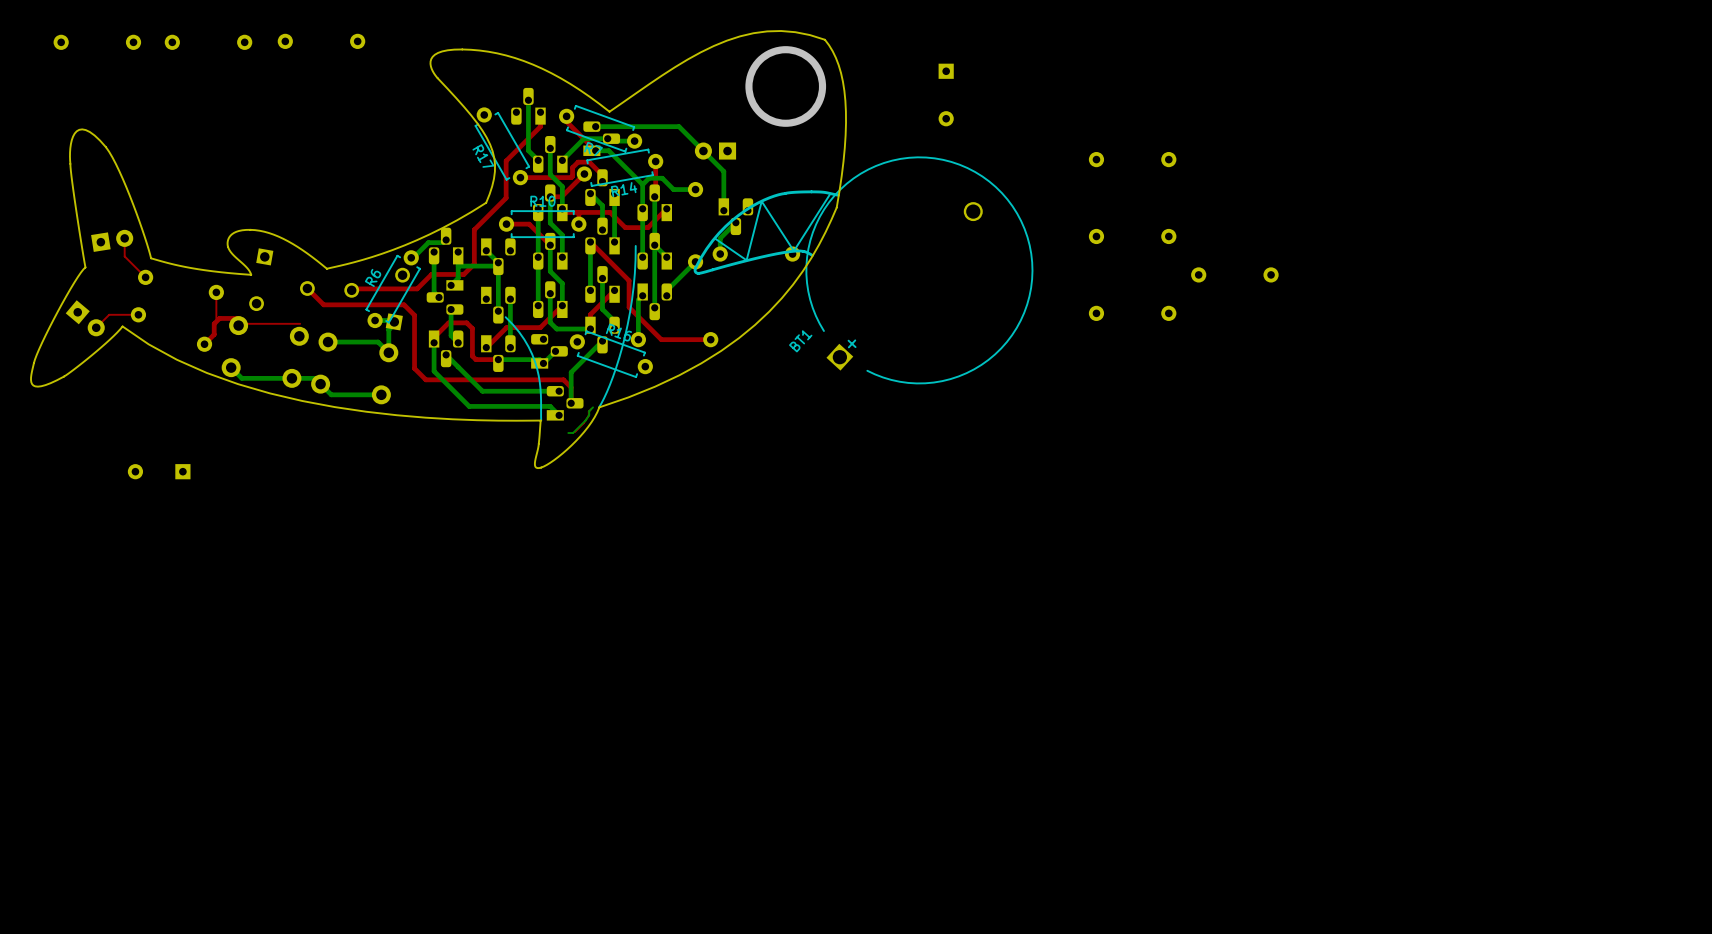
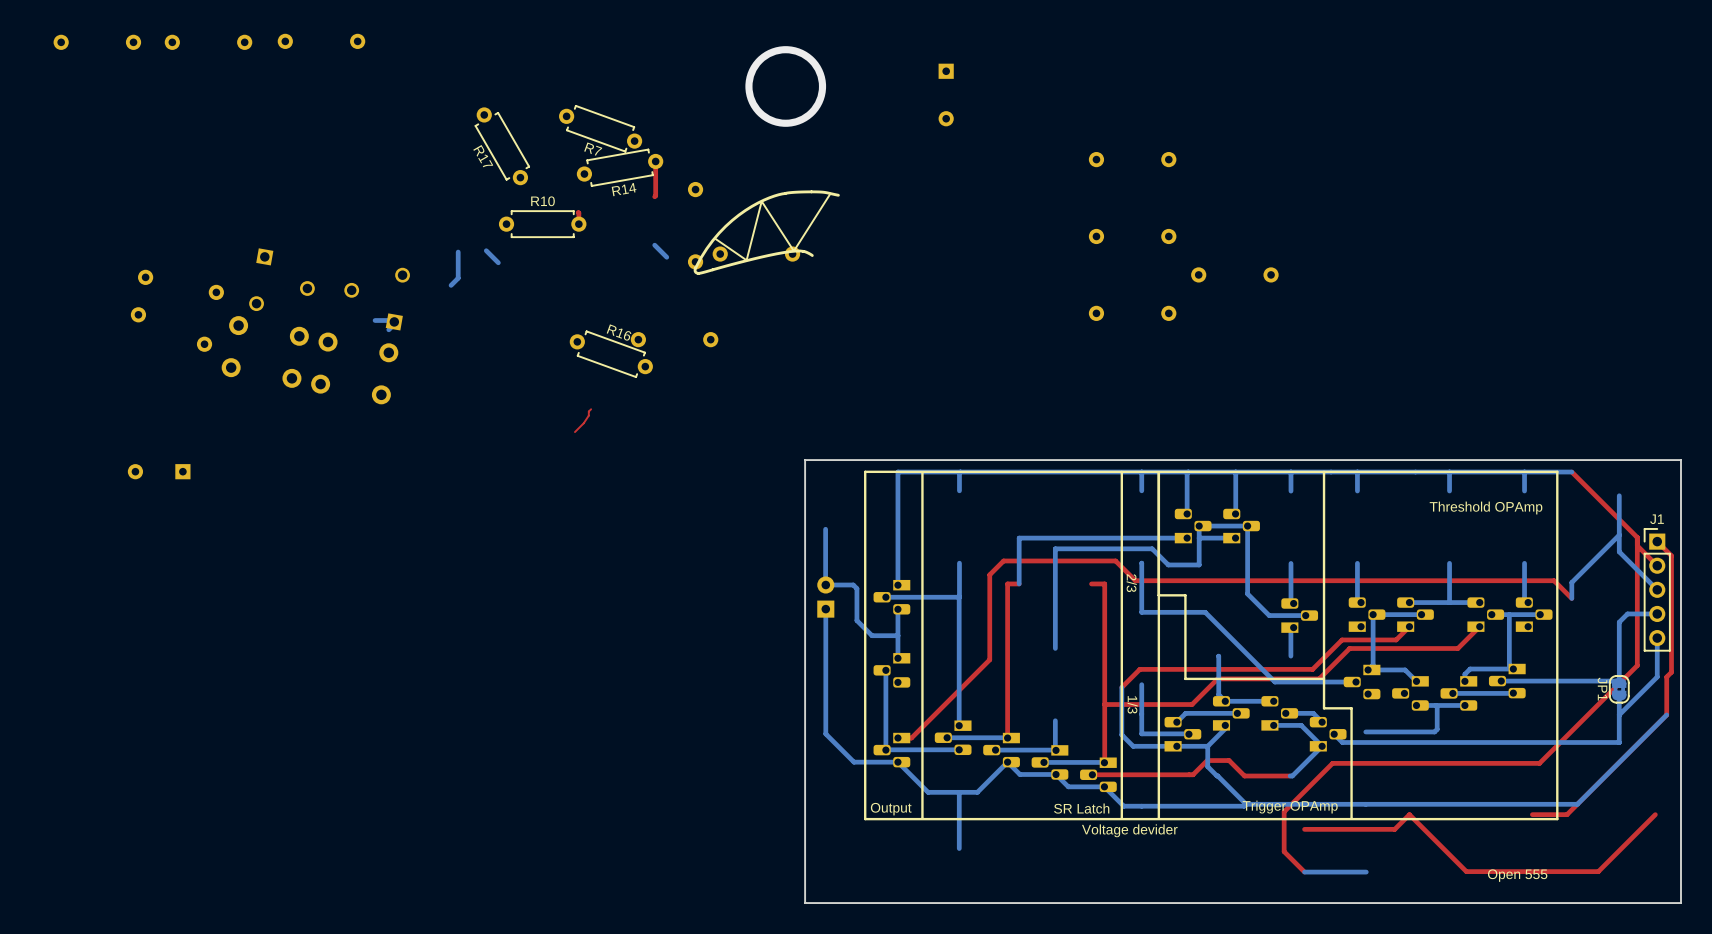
board edge: (824, 39) (835, 57) (842, 81) (845, 111) (844, 147) (836, 207) (819, 244) (802, 271) (769, 311) (739, 338) (679, 375) (628, 397) (599, 407) (591, 421) (575, 441) (558, 456) (543, 466) (537, 468) (534, 464) (540, 420) (425, 417) (366, 411) (302, 401) (238, 384) (206, 372) (148, 344) (122, 326) (101, 347) (65, 375) (41, 386) (32, 384) (31, 377) (33, 363) (42, 342) (66, 296) (85, 267) (70, 160) (71, 140) (79, 129) (85, 130) (94, 135) (112, 157) (133, 204) (151, 258) (197, 269) (251, 274) (246, 267) (230, 252) (227, 242) (230, 235) (236, 231) (255, 230) (269, 233) (288, 241) (326, 268) (362, 259) (404, 245) (443, 227) (486, 202) (494, 171) (492, 151) (477, 123) (432, 71) (431, 59) (438, 52) (454, 49) (479, 50) (523, 61) (570, 83) (609, 111) (674, 67) (726, 40) (753, 33) (781, 31) (809, 35) (824, 39) -> none
bottom track: (528, 100) (528, 150) (538, 160) -> none
part: (528, 106) -> none
top track: (540, 112) (540, 126) (506, 161) (506, 198) (474, 229) (474, 264) (463, 274) (431, 274) (417, 288) (352, 288) -> none
top track: (566, 116) (566, 121) (595, 150) -> none
bottom track: (595, 126) (679, 126) (723, 171) (723, 210) -> none
part: (601, 138) -> none
bottom track: (634, 141) (584, 138) (562, 160) -> none
bottom track: (550, 148) (550, 174) (562, 186) (562, 208) -> none
bottom track: (595, 150) (608, 150) (642, 184) -> none
part: (715, 151) -> none
part: (550, 154) -> none
top track: (584, 174) (561, 196) (550, 196) -> none
top track: (520, 177) (571, 177) (572, 167) (578, 162) (589, 162) (602, 175) (602, 181) -> none
bottom track: (642, 184) (649, 178) (662, 178) (673, 189) (695, 189) -> none
bottom track: (642, 184) (642, 257) -> none
part: (602, 187) -> none
bottom track: (590, 193) (602, 205) (602, 230) -> none
bottom track: (614, 193) (614, 242) -> none
bottom track: (550, 196) (550, 223) (562, 235) (562, 257) -> none
bottom track: (654, 196) (654, 307) -> none
part: (550, 202) -> none
part: (654, 202) -> none
bottom track: (538, 208) (538, 305) -> none
top track: (666, 208) (647, 227) (625, 227) (610, 212) (565, 212) (562, 208) -> none
part: (735, 216) -> none
bottom track: (735, 222) (720, 238) (720, 254) -> none
top track: (506, 224) (529, 224) (550, 245) -> none
part: (602, 236) -> none
top track: (124, 238) (124, 256) (145, 277) -> none
bottom track: (446, 239) (443, 242) (428, 242) (411, 257) -> none
part: (112, 240) -> none
top track: (590, 242) (629, 280) (629, 307) (661, 339) (710, 339) -> none
bottom track: (590, 242) (590, 290) -> none
bottom track: (550, 245) (550, 271) (562, 283) (562, 305) -> none
line: (635, 245) (633, 286) (625, 336) (613, 376) (599, 407) -> none
part: (446, 246) -> none
part: (550, 251) -> none
part: (654, 251) -> none
bottom track: (434, 252) (434, 292) (439, 297) -> none
part: (498, 256) -> none
bottom track: (695, 261) (666, 290) (666, 295) -> none
bottom track: (458, 266) (495, 266) (498, 262) (498, 311) -> none
BT1: (919, 270) -> none
bottom track: (602, 278) (602, 309) (614, 321) (614, 329) -> none
part: (602, 284) -> none
top track: (307, 288) (323, 304) (404, 304) (414, 315) (414, 368) (425, 379) (563, 379) (571, 387) (571, 403) -> none
R6: (393, 289) -> none
top track: (614, 290) (590, 314) (590, 329) -> none
top track: (216, 292) (216, 323) -> none
bottom track: (550, 293) (550, 322) (556, 329) (590, 329) -> none
bottom track: (642, 295) (638, 300) (638, 339) -> none
part: (445, 297) -> none
bottom track: (510, 299) (510, 347) -> none
part: (550, 299) -> none
part: (654, 301) -> none
part: (498, 305) -> none
top track: (562, 305) (540, 327) (506, 327) (486, 347) -> none
bottom track: (451, 309) (451, 335) (458, 342) -> none
top track: (138, 314) (109, 314) (96, 327) -> none
line: (505, 317) (524, 339) (534, 361) (540, 388) (541, 420) -> none
part: (85, 318) -> none
top track: (238, 318) (219, 318) (214, 323) (214, 334) (204, 344) -> none
bottom track: (395, 320) (388, 326) (388, 352) (378, 342) (328, 342) -> none
top track: (300, 323) (244, 323) -> none
part: (602, 335) -> none
bottom track: (602, 341) (571, 372) (571, 403) -> none
top track: (434, 342) (434, 337) (448, 322) (466, 322) (472, 328) (472, 356) (475, 359) (498, 359) -> none
bottom track: (434, 342) (434, 371) (469, 406) (550, 406) (559, 415) -> none
part: (446, 348) -> none
part: (549, 351) -> none
bottom track: (555, 351) (543, 363) (539, 359) (498, 359) -> none
part: (498, 353) -> none
bottom track: (446, 354) (482, 391) (559, 391) -> none
bottom track: (231, 367) (241, 378) (314, 378) (331, 394) (381, 394) -> none
part: (565, 403) -> none
bottom track: (593, 407) (585, 420) (573, 433) (568, 433) -> none
board edge: none -> (1680, 460) (805, 460) (805, 903) (1680, 903) (1680, 460)
line: none -> (1121, 471) (1121, 818)
line: none -> (1324, 471) (1324, 708) (1351, 708) (1351, 818)
line: none -> (1557, 471) (865, 471) (865, 819) (1557, 819) (1557, 471)
line: none -> (922, 472) (922, 818)
bottom track: none -> (960, 472) (959, 490)
bottom track: none -> (1141, 472) (1141, 490)
line: none -> (1158, 472) (1158, 818)
bottom track: none -> (1188, 472) (1187, 513)
bottom track: none -> (1235, 472) (1235, 513)
bottom track: none -> (1290, 472) (1290, 491)
bottom track: none -> (1357, 472) (1357, 491)
bottom track: none -> (1449, 472) (1449, 491)
bottom track: none -> (1524, 472) (1524, 491)
top track: none -> (1571, 472) (1637, 537) (1637, 665) (1539, 763) (1332, 763) (1284, 811) (1284, 851) (1304, 872)
bottom track: none -> (1571, 472) (897, 472) (897, 585)
bottom track: none -> (1619, 495) (1619, 551) (1657, 589)
text: none -> Threshold OPAmp (1486, 508)
part: none -> (1193, 526)
part: none -> (1241, 526)
bottom track: none -> (825, 529) (825, 584) (853, 585) (856, 588) (856, 620) (872, 635) (897, 635)
bottom track: none -> (1619, 535) (1571, 582) (1571, 598)
bottom track: none -> (1187, 538) (1019, 538) (1019, 583)
bottom track: none -> (1235, 538) (1199, 538)
top track: none -> (1657, 541) (1671, 555) (1671, 672) (1666, 677) (1666, 714) (1567, 814) (1532, 814)
top track: none -> (1637, 545) (1657, 565)
bottom track: none -> (959, 563) (959, 597)
bottom track: none -> (1141, 563) (1141, 612) (1205, 612) (1274, 682) (1356, 682)
bottom track: none -> (1290, 563) (1290, 600) (1293, 603)
bottom track: none -> (1357, 563) (1357, 598) (1361, 602)
bottom track: none -> (1449, 563) (1449, 602)
bottom track: none -> (1524, 563) (1524, 598) (1528, 602)
top track: none -> (1135, 580) (1554, 580) (1571, 598)
top track: none -> (1135, 580) (1115, 560) (1003, 560) (989, 574) (989, 659) (911, 738) (897, 738)
top track: none -> (1019, 583) (1007, 583) (1007, 738)
top track: none -> (1091, 583) (1104, 583) (1104, 762)
text: none -> 2/3 (1131, 583)
J1: none -> (1657, 589)
line: none -> (1158, 595) (1185, 595) (1185, 678) (1324, 678)
part: none -> (825, 597)
part: none -> (891, 597)
bottom track: none -> (959, 597) (959, 725)
bottom track: none -> (959, 597) (885, 597)
bottom track: none -> (1479, 602) (1409, 602)
bottom track: none -> (825, 609) (825, 733) (853, 762) (897, 762) (928, 792) (977, 792) (1007, 762) (1019, 774) (1056, 774) (1068, 786) (1104, 786) (1123, 806) (1244, 806) (1246, 804)
bottom track: none -> (897, 609) (897, 658)
bottom track: none -> (1657, 613) (1627, 613) (1619, 622) (1619, 681) (1501, 681)
part: none -> (1367, 614)
part: none -> (1415, 614)
bottom track: none -> (1421, 614) (1373, 614) (1373, 664) (1368, 669) (1405, 669) (1416, 681)
part: none -> (1485, 614)
bottom track: none -> (1509, 614) (1509, 665) (1513, 669)
part: none -> (1534, 614)
bottom track: none -> (1540, 614) (1491, 614)
part: none -> (1299, 615)
bottom track: none -> (1305, 616) (1269, 615) (1247, 593) (1247, 526) (1199, 526) (1199, 564) (1168, 564) (1152, 548) (1055, 548) (1055, 648)
top track: none -> (1409, 626) (1396, 639) (1342, 639) (1312, 669) (1139, 669) (1121, 687)
top track: none -> (1479, 626) (1457, 648) (1349, 648) (1319, 678) (1217, 678) (1192, 704) (1104, 704)
bottom track: none -> (1293, 627) (1290, 630) (1290, 656)
bottom track: none -> (1657, 638) (1657, 676) (1619, 714)
bottom track: none -> (1218, 656) (1218, 694) (1225, 701) (1273, 701)
bottom track: none -> (1513, 669) (1470, 669) (1464, 674) (1464, 681)
bottom track: none -> (885, 670) (885, 750) (959, 749)
part: none -> (891, 670)
part: none -> (1507, 681)
part: none -> (1362, 682)
bottom track: none -> (1141, 684) (1141, 733) (1188, 734)
bottom track: none -> (1121, 687) (1121, 734) (1133, 746) (1207, 746)
JP1: none -> (1619, 689)
part: none -> (1410, 693)
part: none -> (1458, 693)
bottom track: none -> (1513, 693) (1452, 693)
bottom track: none -> (1619, 695) (1619, 742) (1342, 742) (1334, 734)
bottom track: none -> (1436, 705) (1437, 729) (1434, 731) (1365, 731)
bottom track: none -> (1464, 705) (1416, 705)
text: none -> 1/3 (1132, 704)
part: none -> (1231, 713)
bottom track: none -> (1237, 713) (1185, 713) (1176, 722)
part: none -> (1279, 713)
bottom track: none -> (1285, 713) (1313, 713) (1322, 722)
bottom track: none -> (1666, 714) (1577, 804) (1246, 804)
bottom track: none -> (1055, 720) (1056, 750)
bottom track: none -> (1225, 725) (1225, 728) (1207, 746)
bottom track: none -> (1273, 725) (1301, 725) (1322, 746) (1292, 776) (1290, 776)
part: none -> (1182, 734)
part: none -> (1328, 734)
bottom track: none -> (947, 737) (1007, 738)
part: none -> (953, 737)
bottom track: none -> (1207, 746) (1207, 766) (1246, 804)
part: none -> (891, 750)
part: none -> (1001, 750)
bottom track: none -> (1055, 750) (995, 750)
part: none -> (1049, 762)
bottom track: none -> (1104, 762) (1043, 762)
top track: none -> (1092, 774) (1193, 774) (1207, 760) (1229, 760) (1244, 776) (1290, 776)
part: none -> (1098, 774)
bottom track: none -> (959, 792) (959, 848)
text: none -> Trigger OPAmp (1290, 807)
text: none -> SR Latch (1081, 808)
text: none -> Output (891, 809)
top track: none -> (1655, 814) (1598, 871) (1466, 871) (1409, 814) (1394, 829) (1304, 829)
text: none -> Voltage devider (1129, 830)
bottom track: none -> (1366, 872) (1304, 872)
text: none -> Open 555 (1517, 875)

